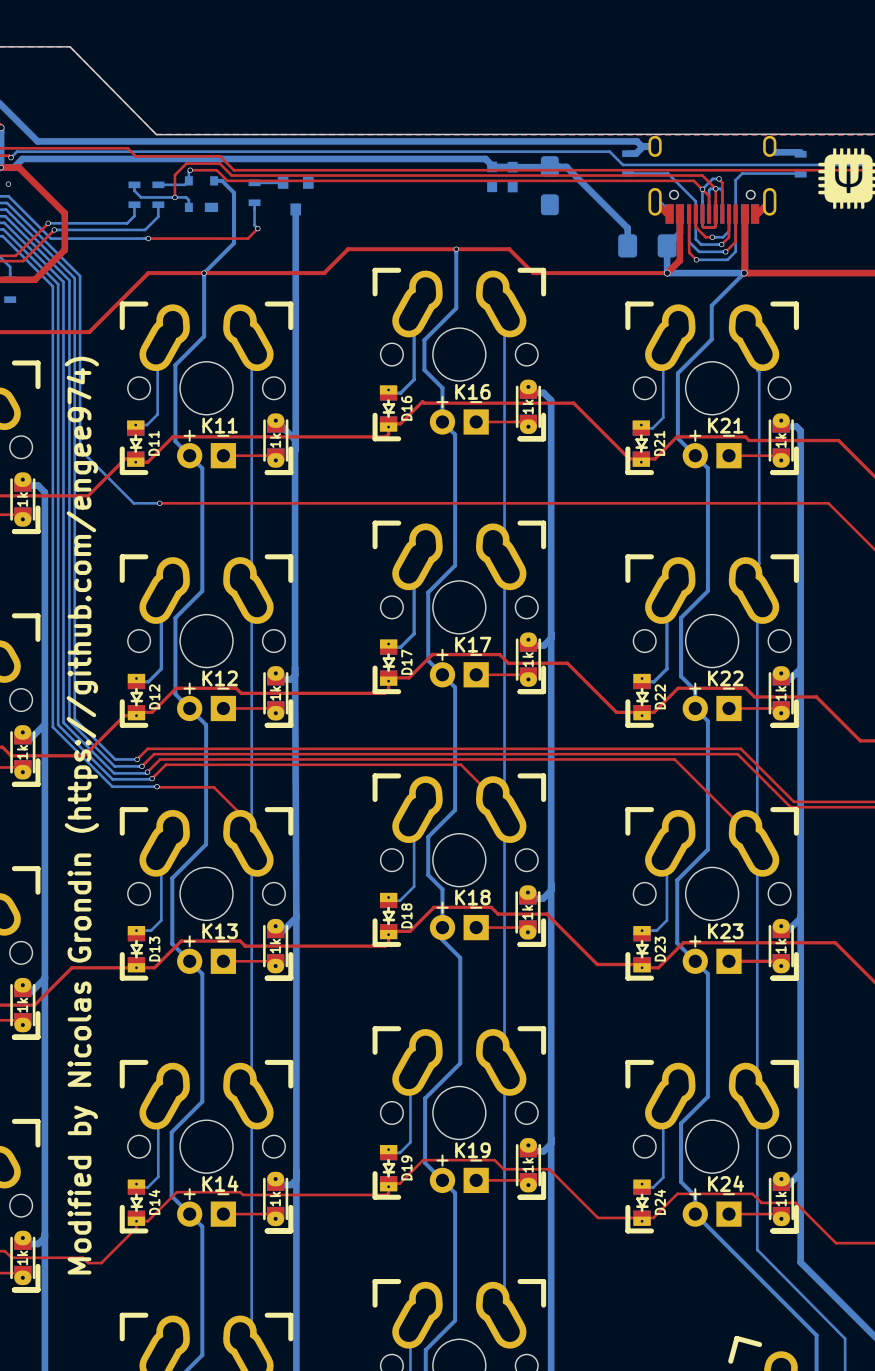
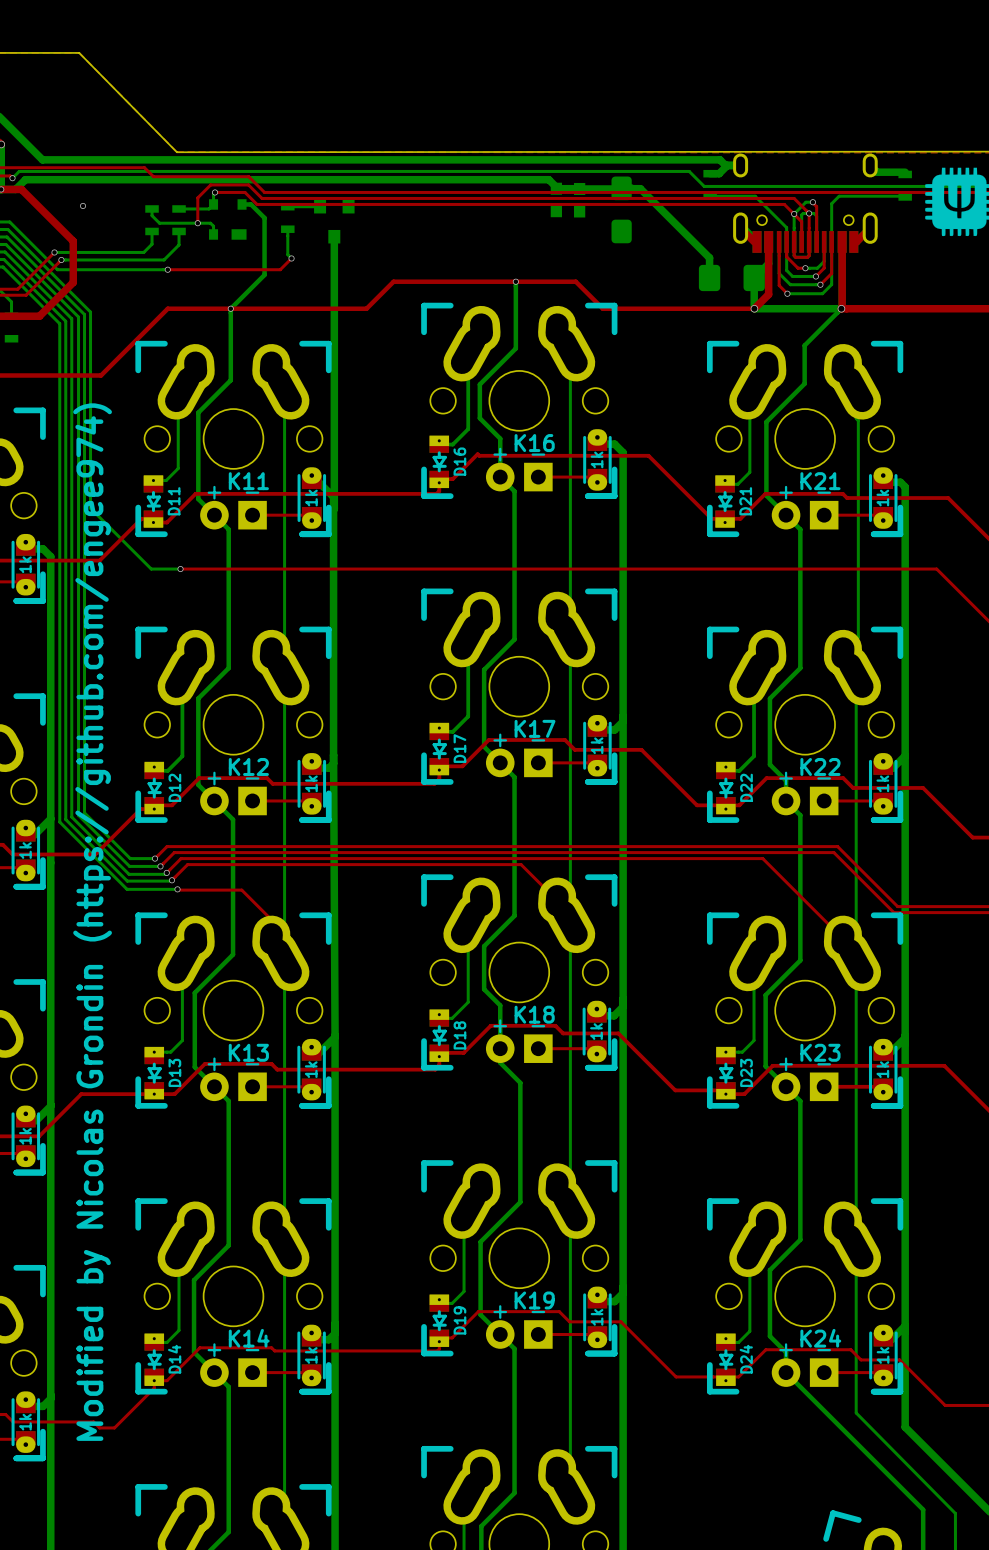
via position: (8, 184) -> (83, 205)

